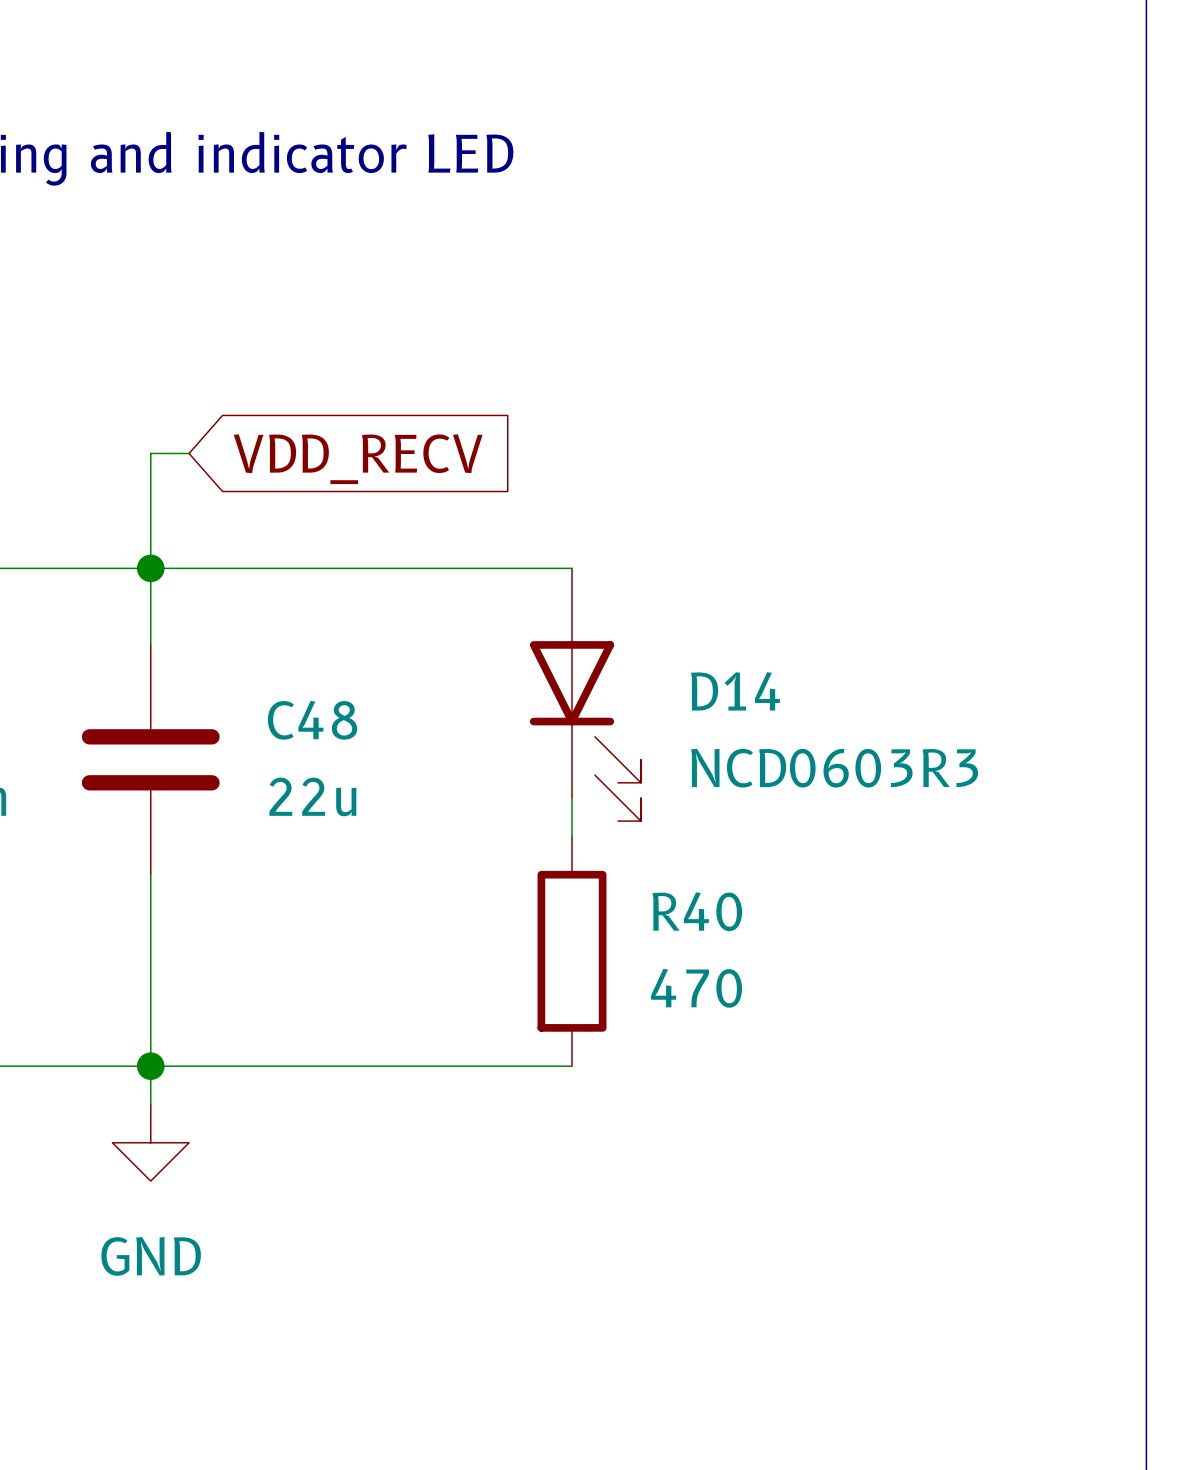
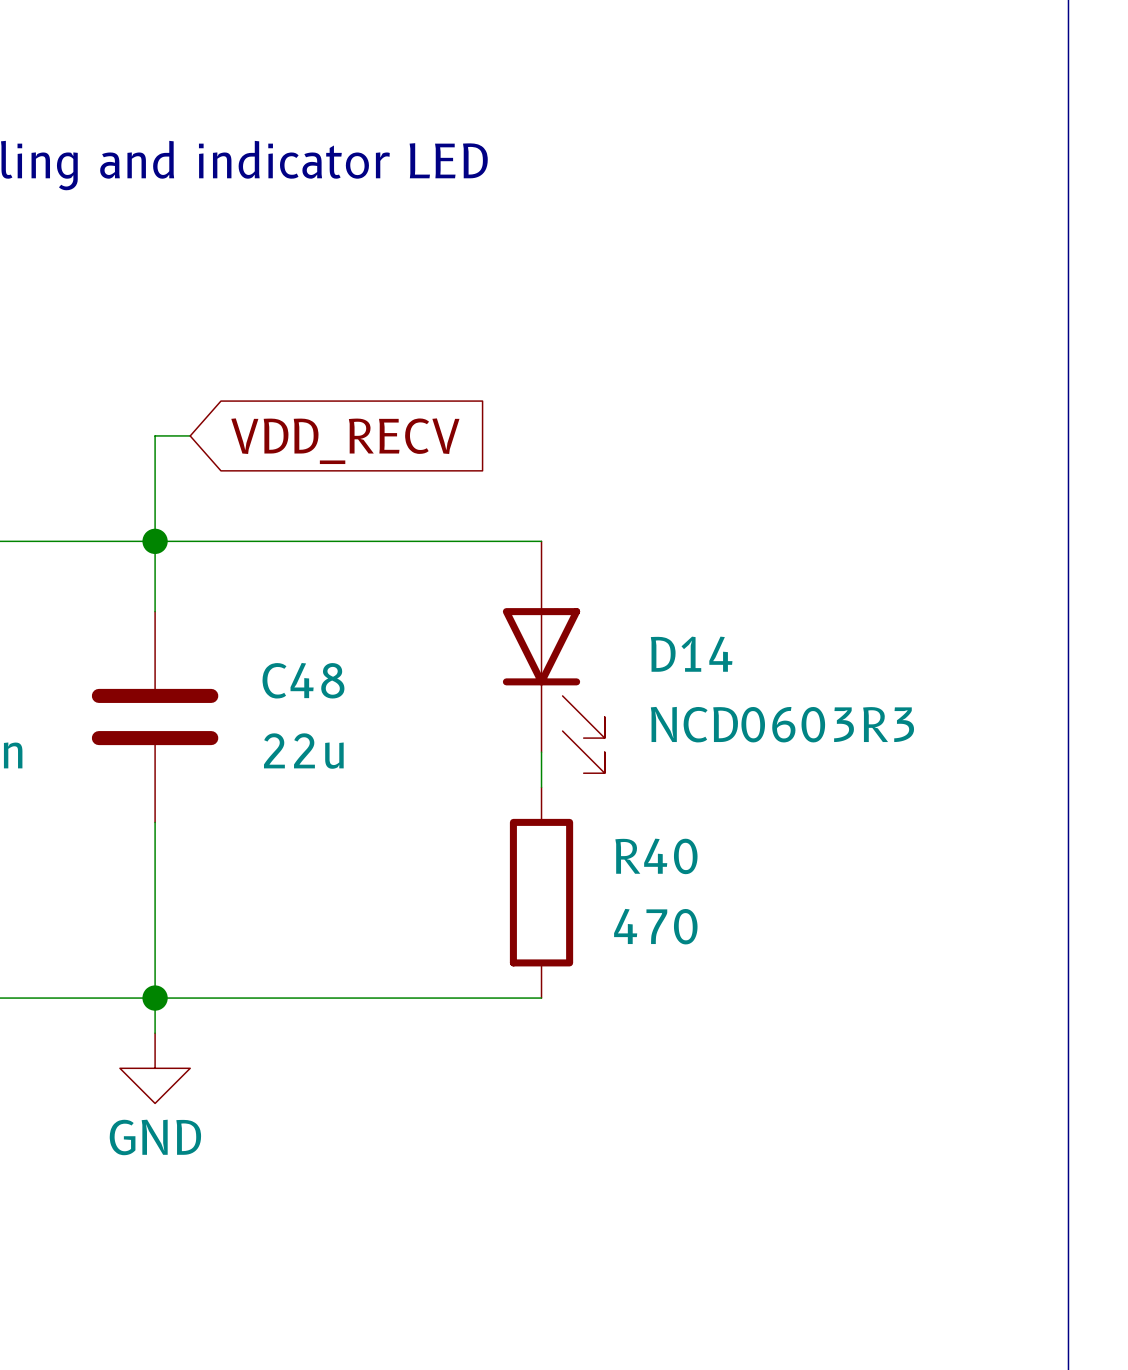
power symbol text position: GND (151, 1256) -> GND (155, 1137)

